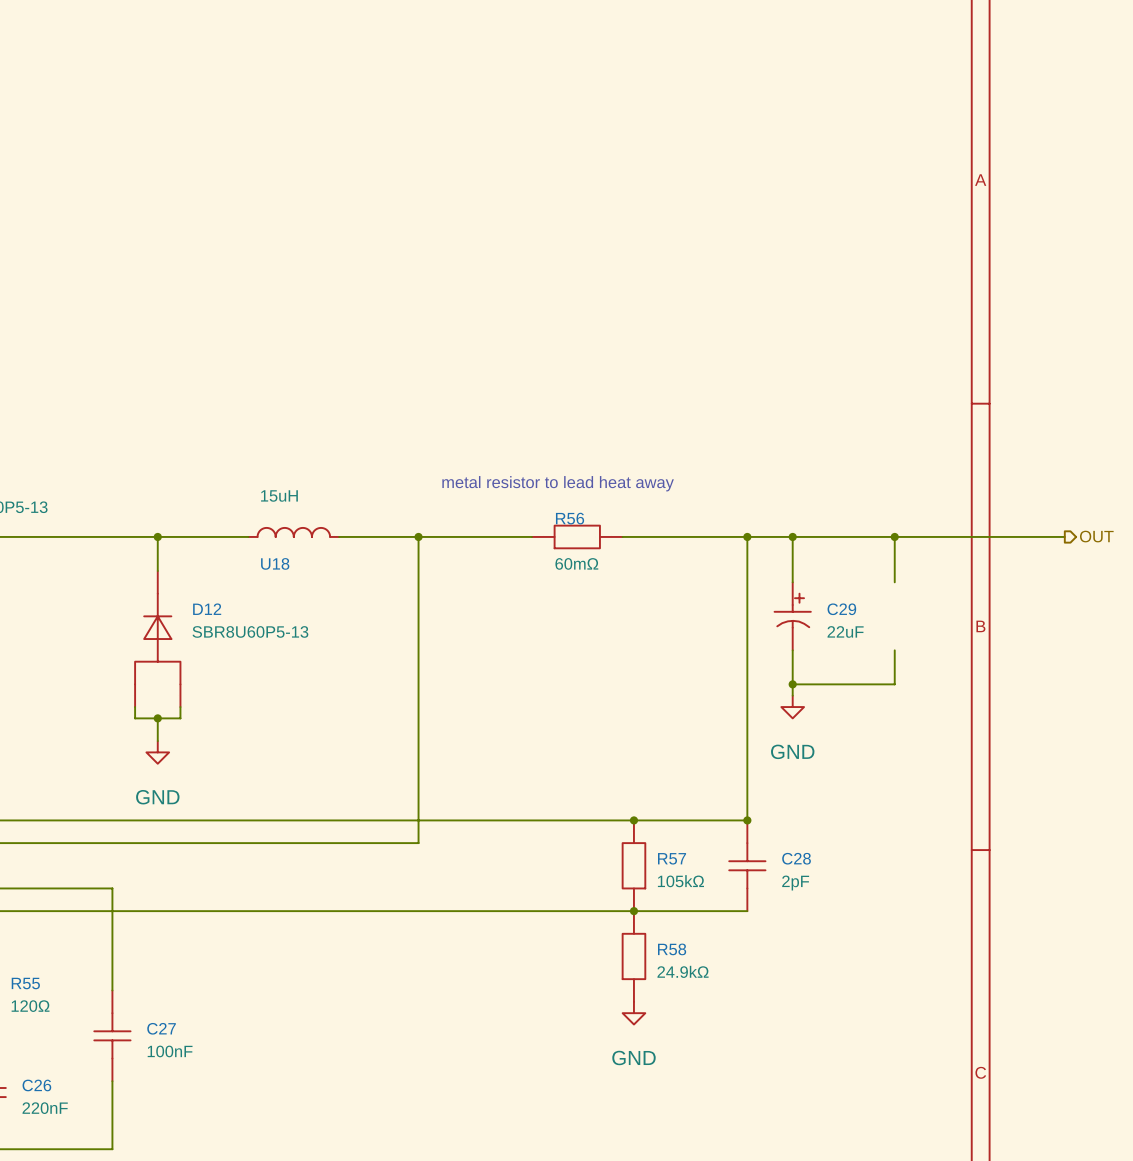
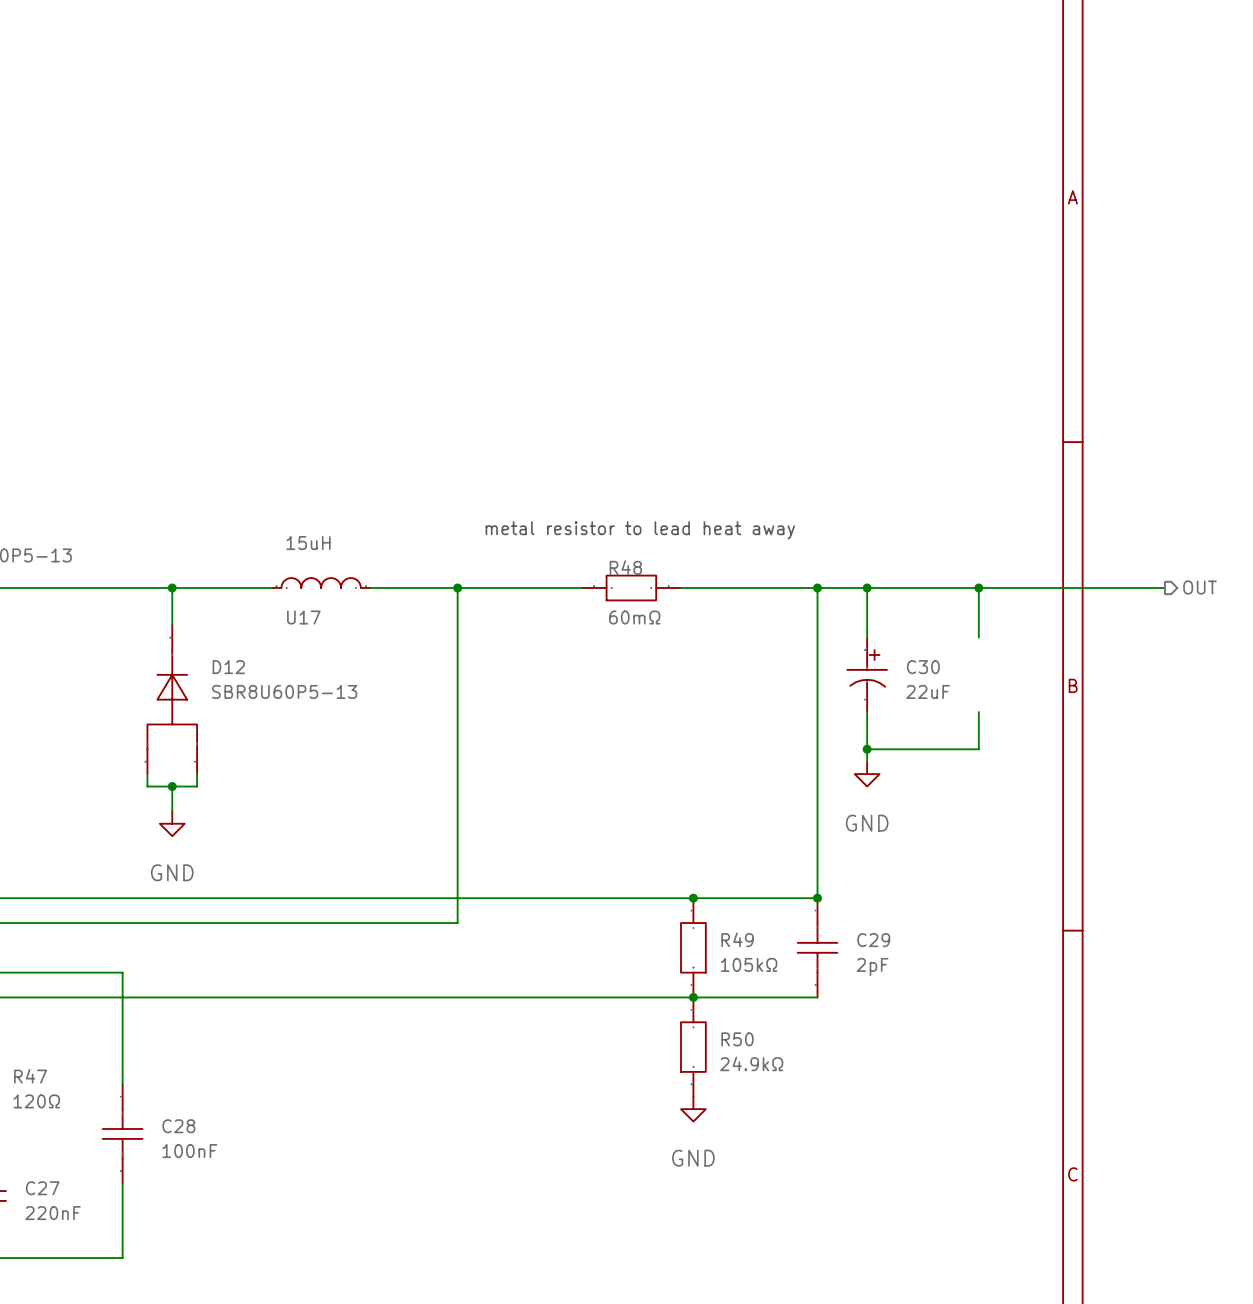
R56 name: R56 (570, 518) -> R48 (625, 567)
U18 name: U18 (275, 563) -> U17 (303, 617)
C29 name: C29 (841, 609) -> C30 (923, 667)
R57 name: R57 (672, 858) -> R49 (737, 939)
C28 name: C28 (796, 858) -> C29 (873, 940)
R58 name: R58 (672, 949) -> R50 (737, 1039)
R55 name: R55 (25, 983) -> R47 (30, 1076)
C27 name: C27 (161, 1028) -> C28 (178, 1126)
C26 name: C26 (36, 1085) -> C27 (42, 1188)

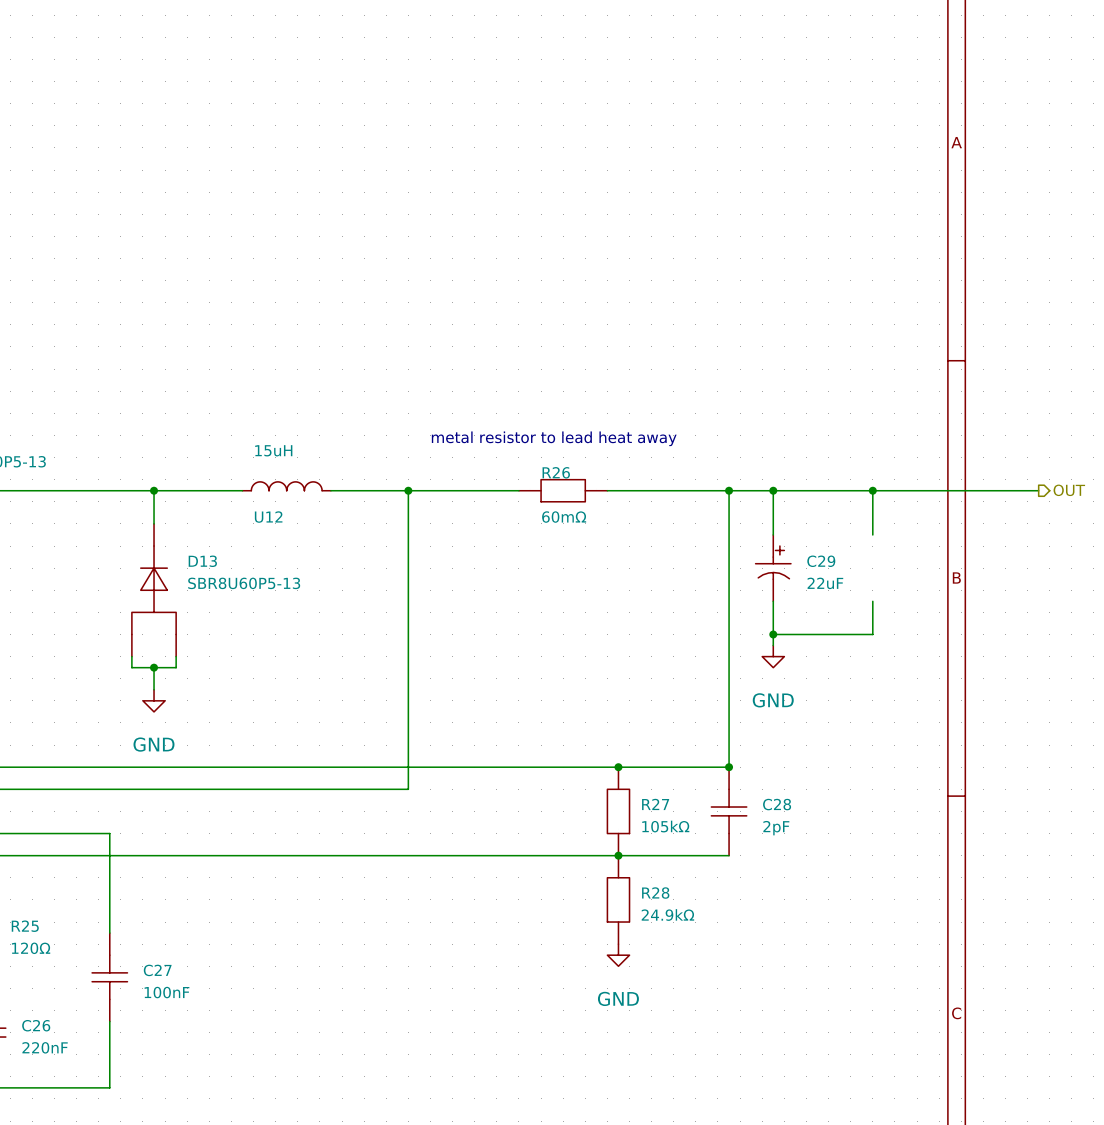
R48 name: R48 (625, 567) -> R26 (556, 472)
U17 name: U17 (303, 617) -> U12 (268, 517)
D12 name: D12 (228, 667) -> D13 (202, 561)
C30 name: C30 (923, 667) -> C29 (821, 561)
R49 name: R49 (737, 939) -> R27 (655, 804)
C29 name: C29 (873, 940) -> C28 (777, 804)
R50 name: R50 (737, 1039) -> R28 (655, 893)
R47 name: R47 (30, 1076) -> R25 (25, 926)
C28 name: C28 (178, 1126) -> C27 (157, 970)
C27 name: C27 (42, 1188) -> C26 (36, 1025)

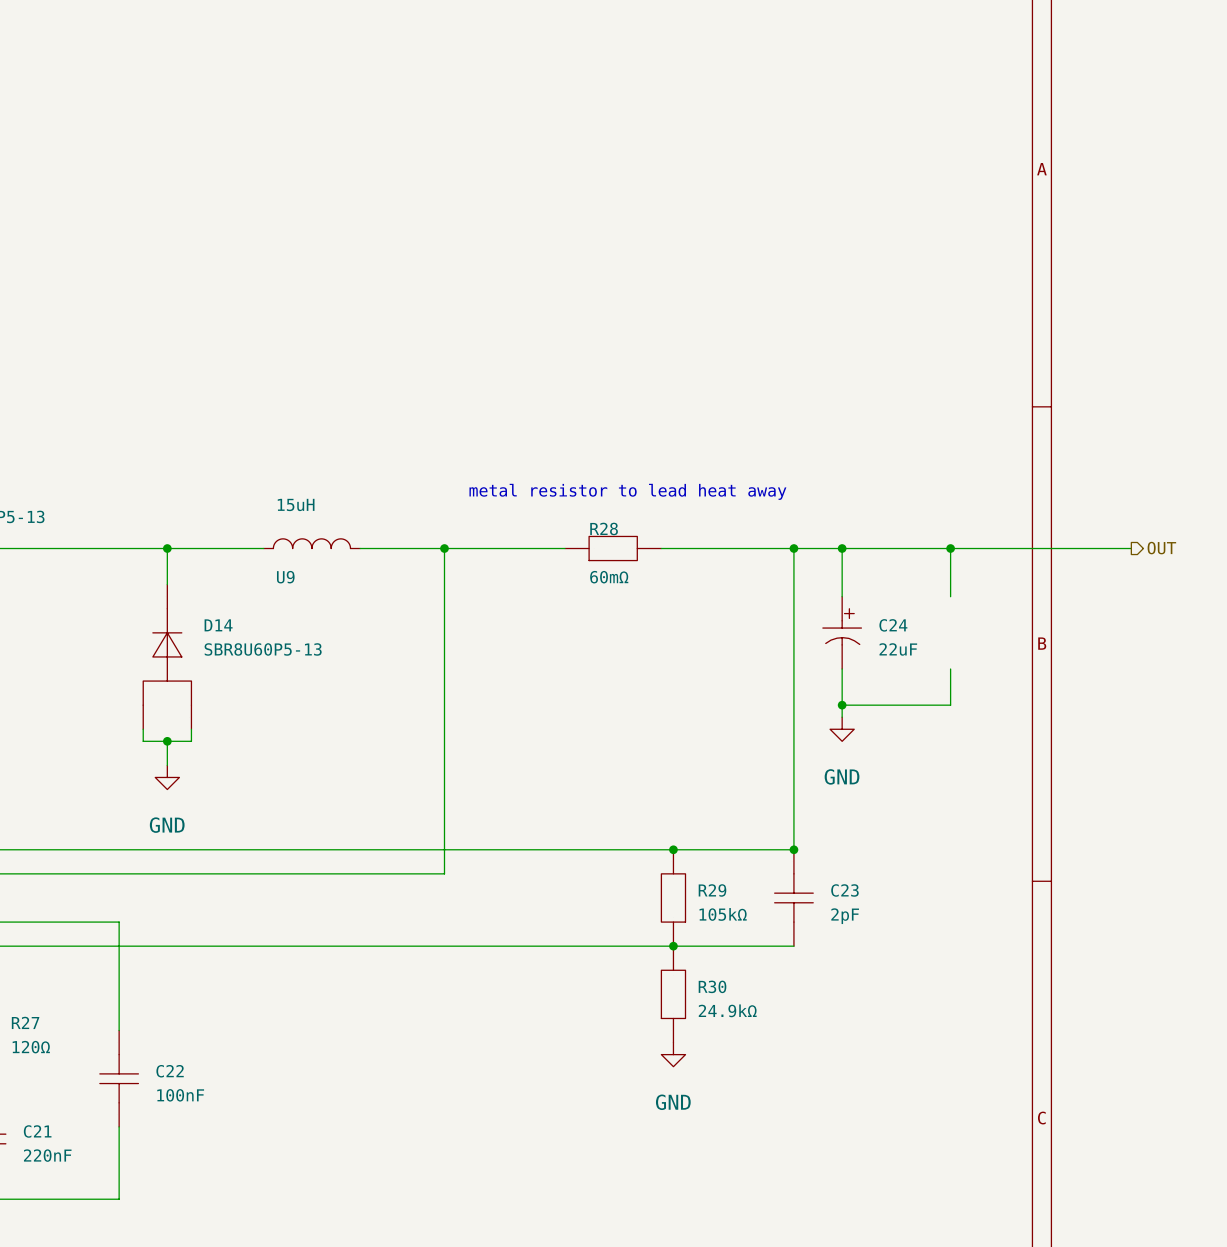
R26 name: R26 (556, 472) -> R28 (604, 528)
U12 name: U12 (268, 517) -> U9 (285, 577)
D13 name: D13 (202, 561) -> D14 (218, 625)
C29 name: C29 (821, 561) -> C24 (893, 625)
R27 name: R27 (655, 804) -> R29 (712, 890)
C28 name: C28 (777, 804) -> C23 (844, 890)
R28 name: R28 (655, 893) -> R30 (712, 986)
R25 name: R25 (25, 926) -> R27 (25, 1022)
C27 name: C27 (157, 970) -> C22 (170, 1071)
C26 name: C26 (36, 1025) -> C21 (37, 1131)

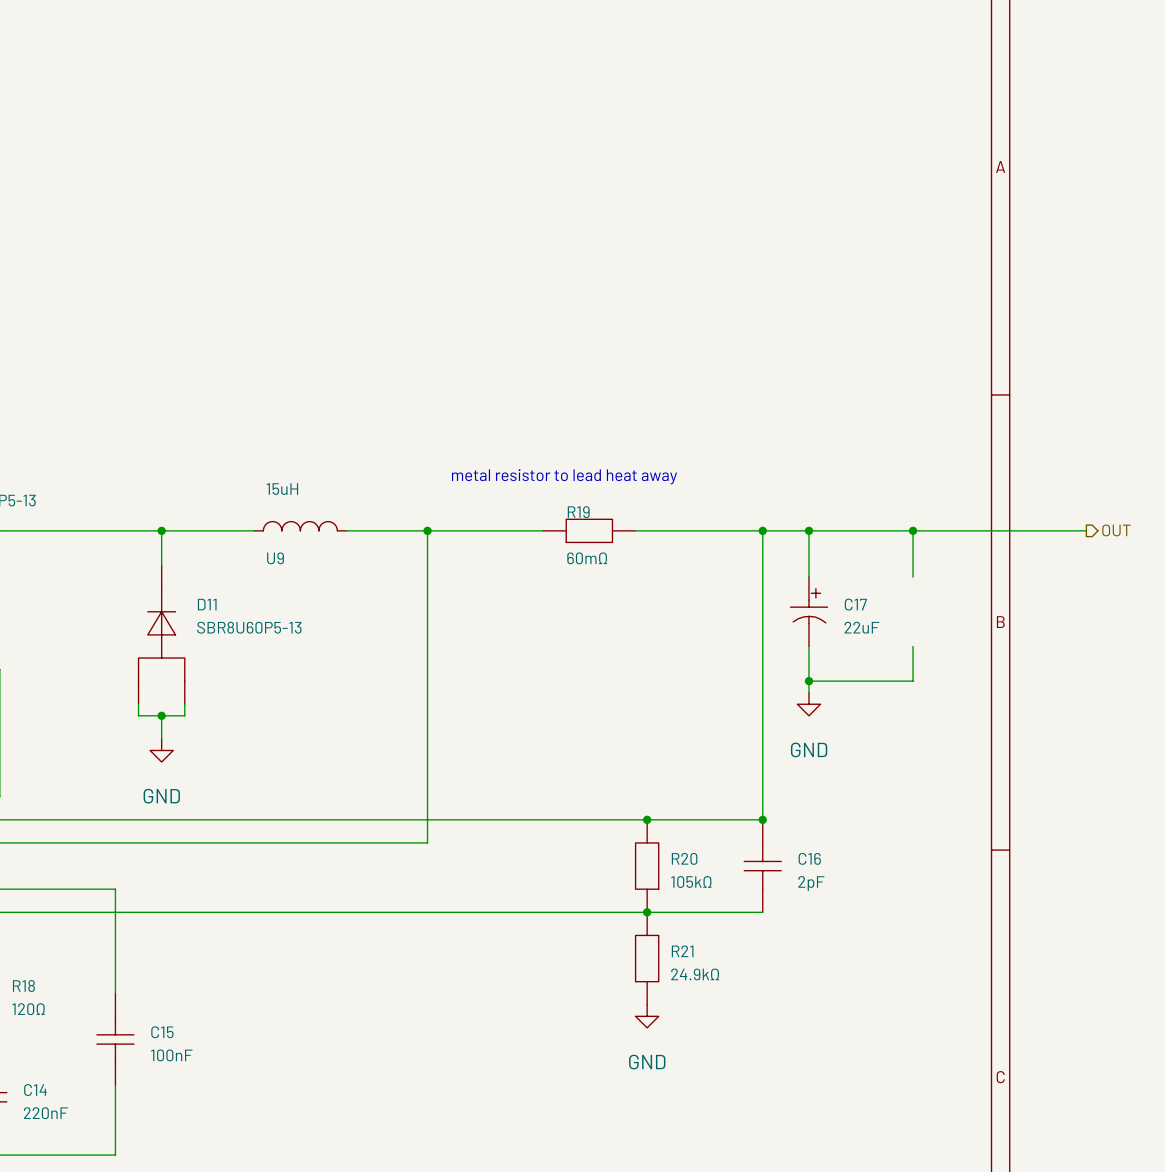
R28 name: R28 (604, 528) -> R19 (578, 512)
D14 name: D14 (218, 625) -> D11 (207, 604)
C24 name: C24 (893, 625) -> C17 (855, 604)
R29 name: R29 (712, 890) -> R20 (684, 858)
C23 name: C23 (844, 890) -> C16 (809, 858)
R30 name: R30 (712, 986) -> R21 (682, 951)
R27 name: R27 (25, 1022) -> R18 (23, 986)
C22 name: C22 (170, 1071) -> C15 (162, 1032)
C21 name: C21 (37, 1131) -> C14 (35, 1090)

